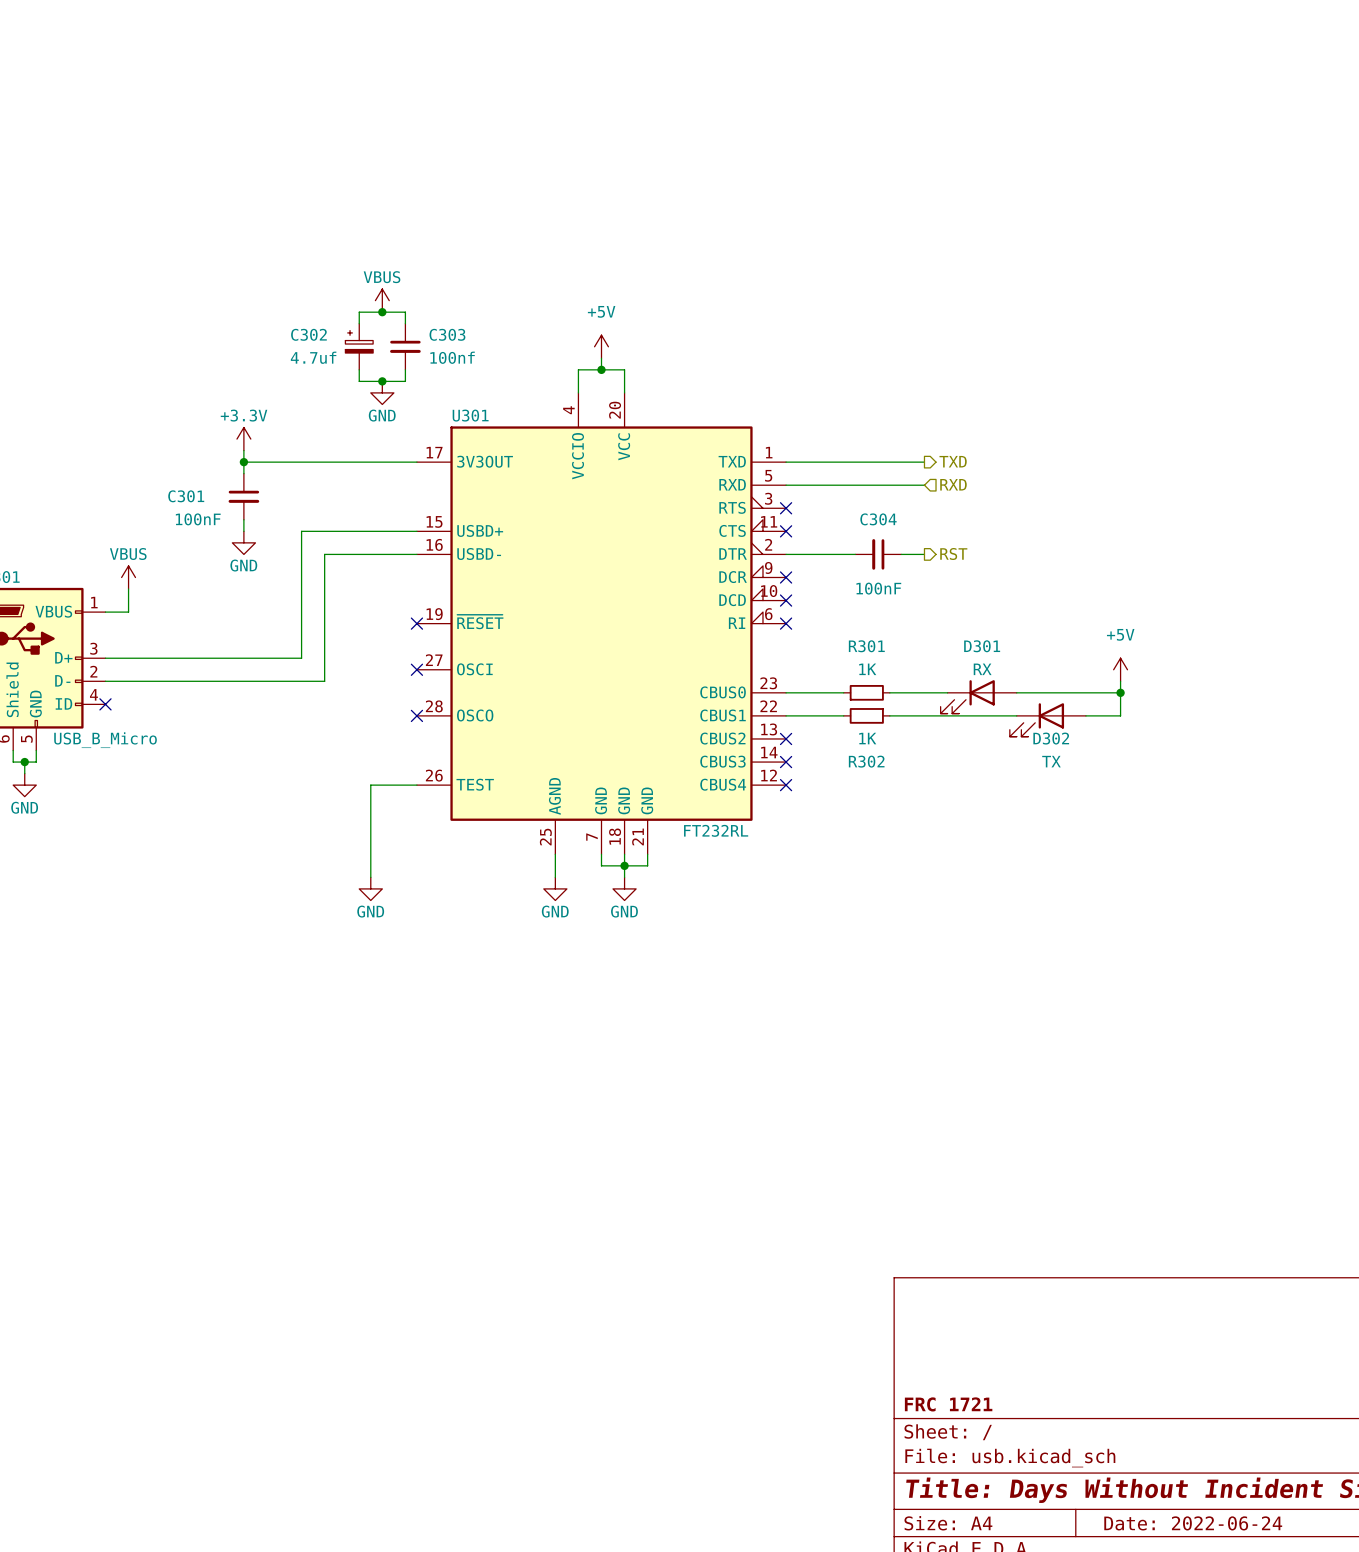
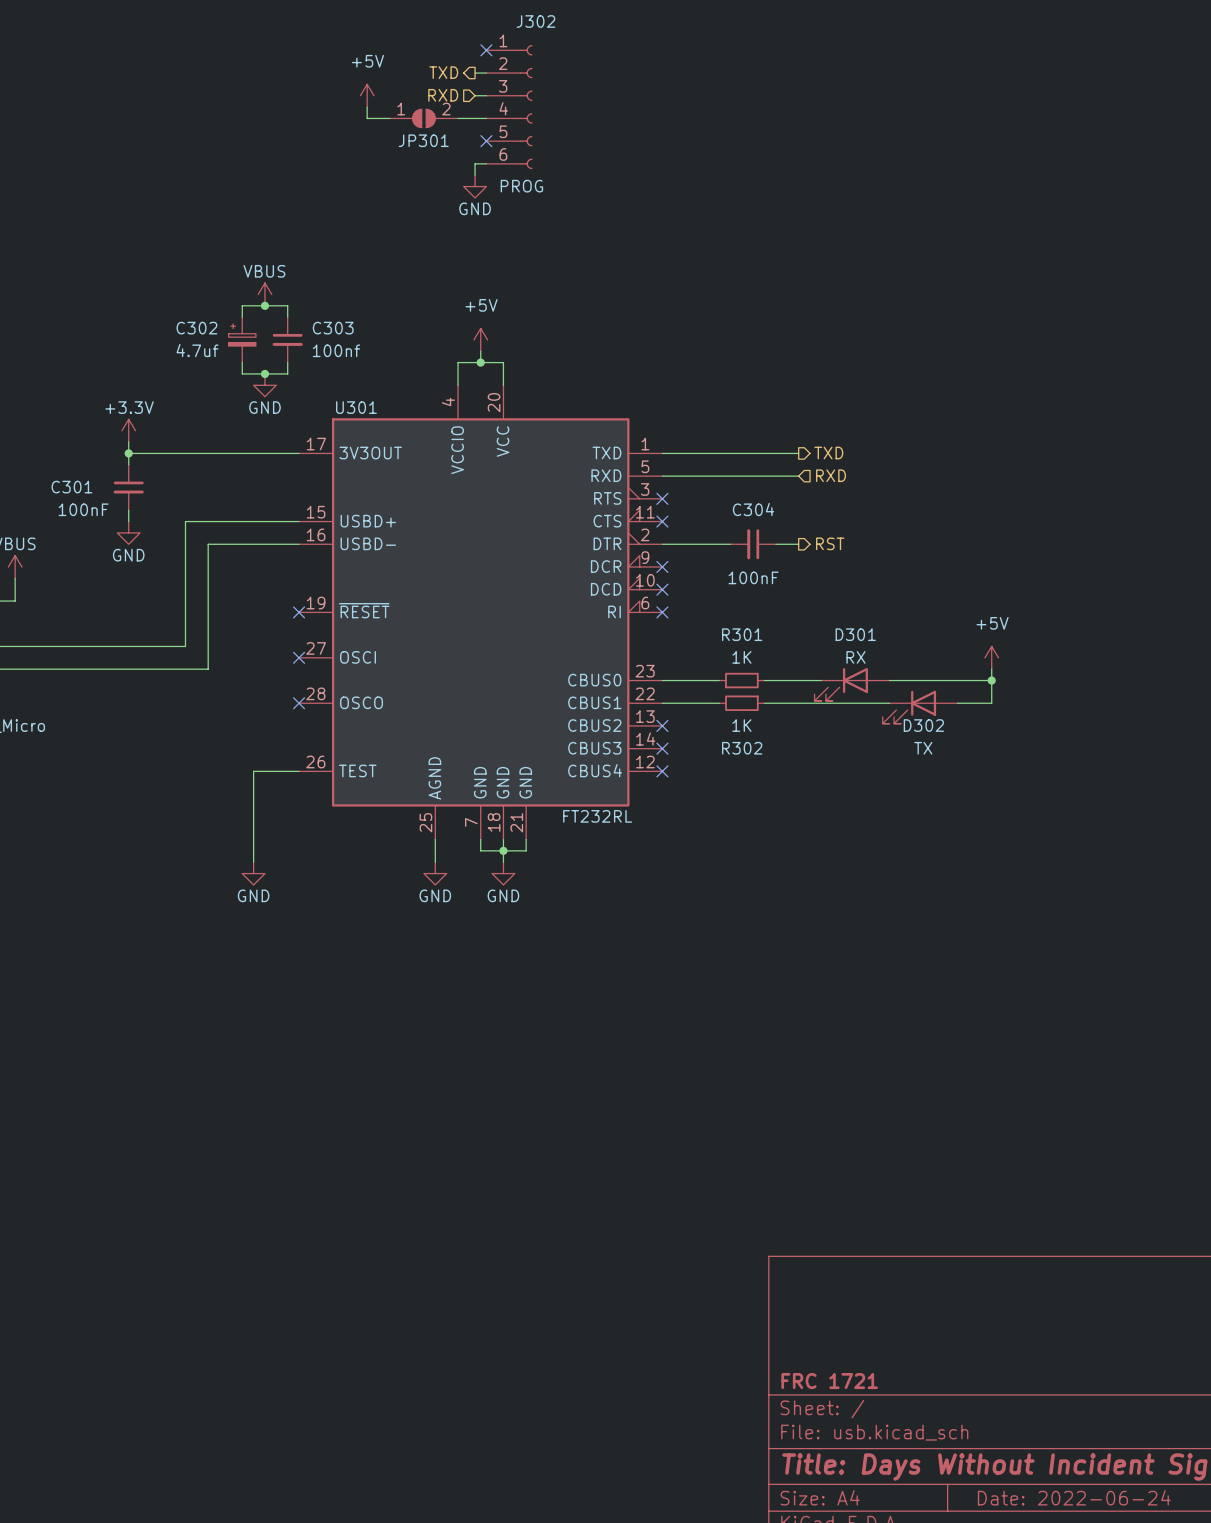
no-connect mark: none -> (486, 50)
hierarchical label: none -> TXD (443, 72)
wire: none -> (475, 73) (486, 73)
power symbol: none -> +5V (367, 95)
hierarchical label: none -> RXD (443, 95)
wire: none -> (475, 95) (486, 95)
wire: none -> (367, 107) (367, 118) (389, 118)
J302: none -> PROG (509, 107)
JP301: none -> (423, 118)
wire: none -> (458, 118) (486, 118)
no-connect mark: none -> (486, 141)
wire: none -> (486, 163) (475, 163) (475, 175)
power symbol: none -> GND (475, 186)

